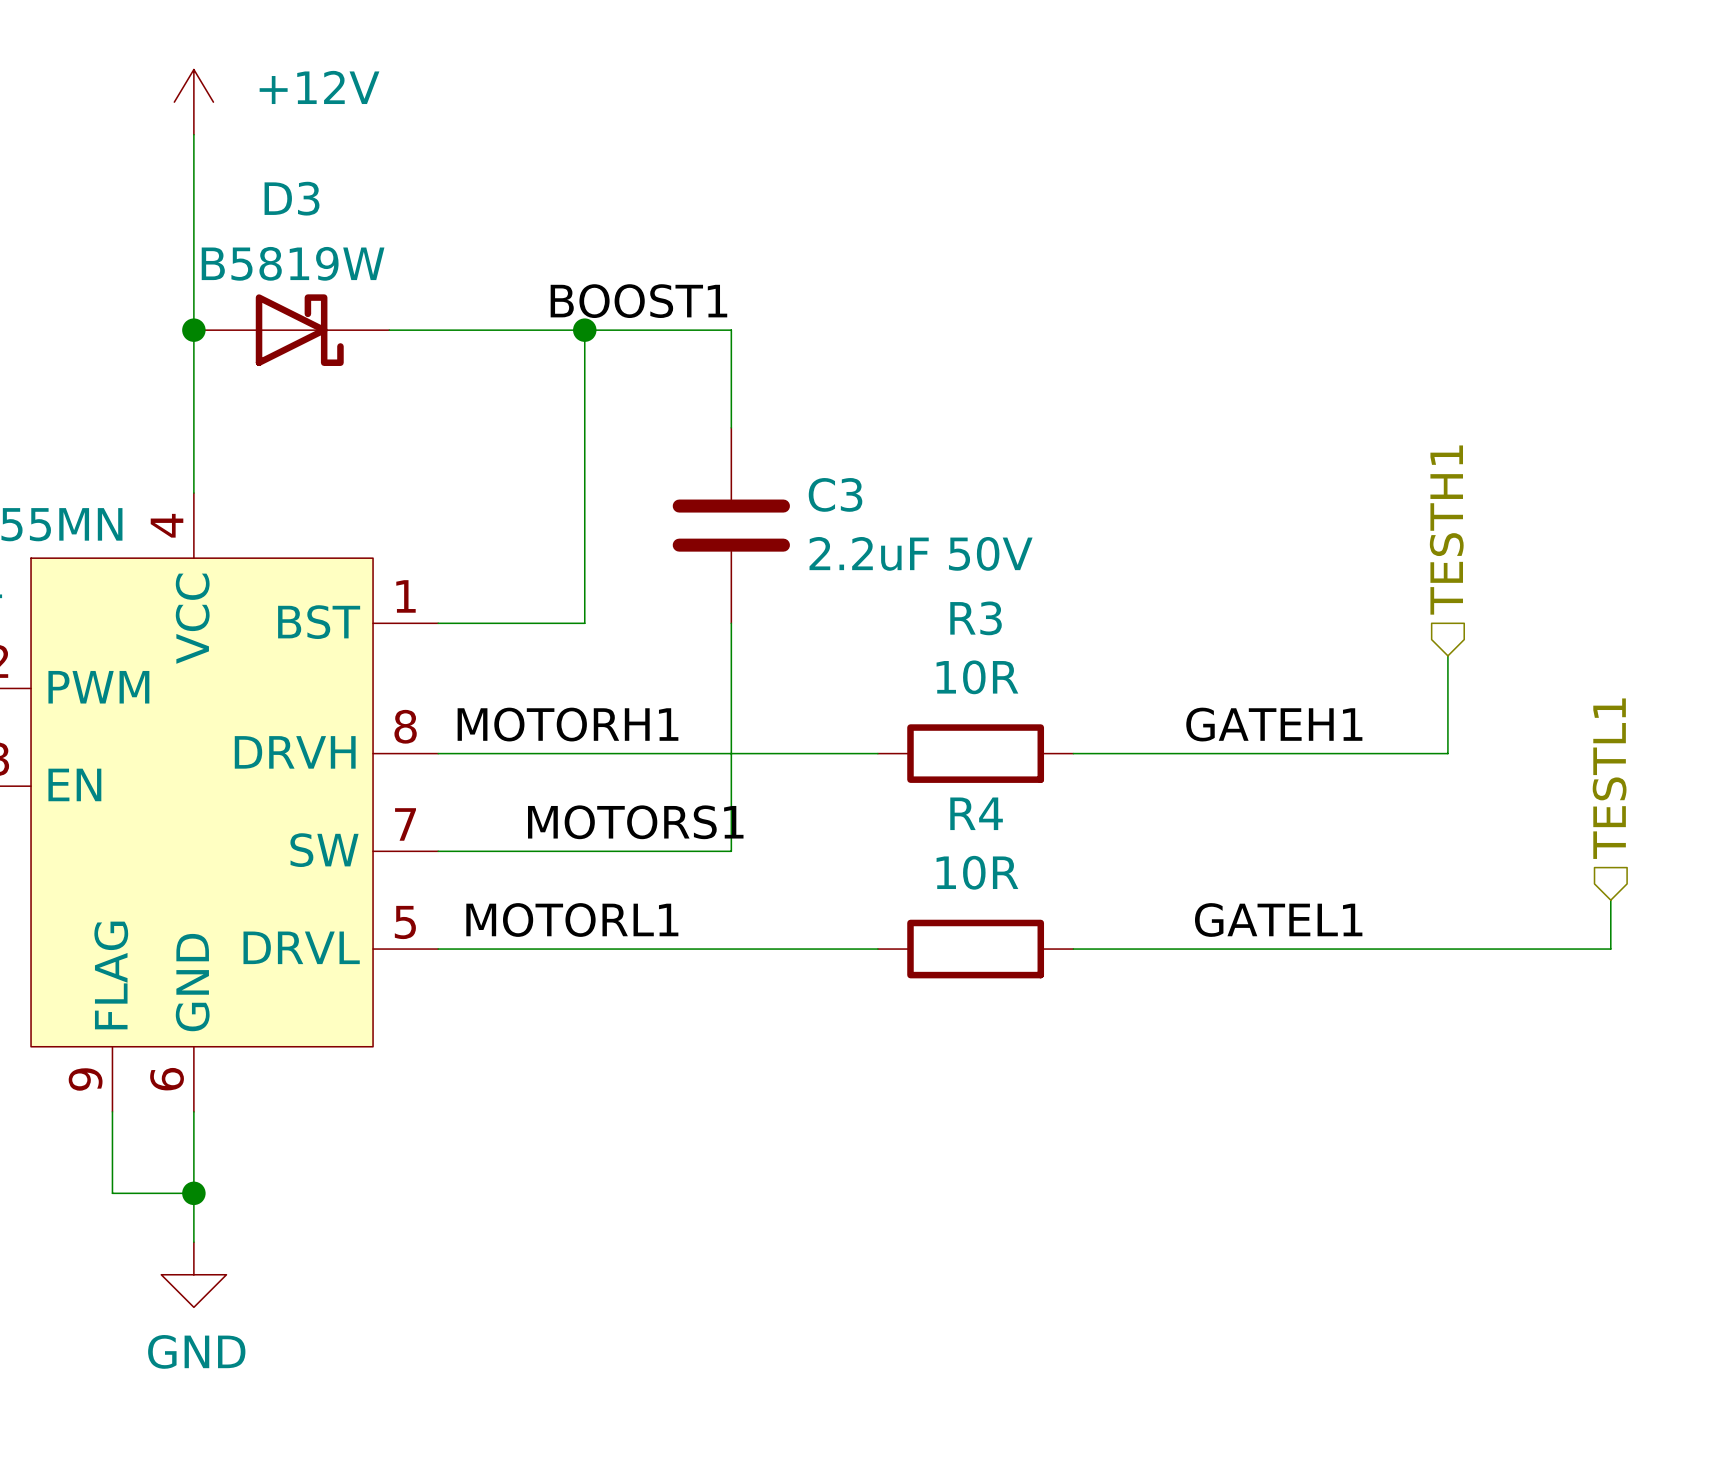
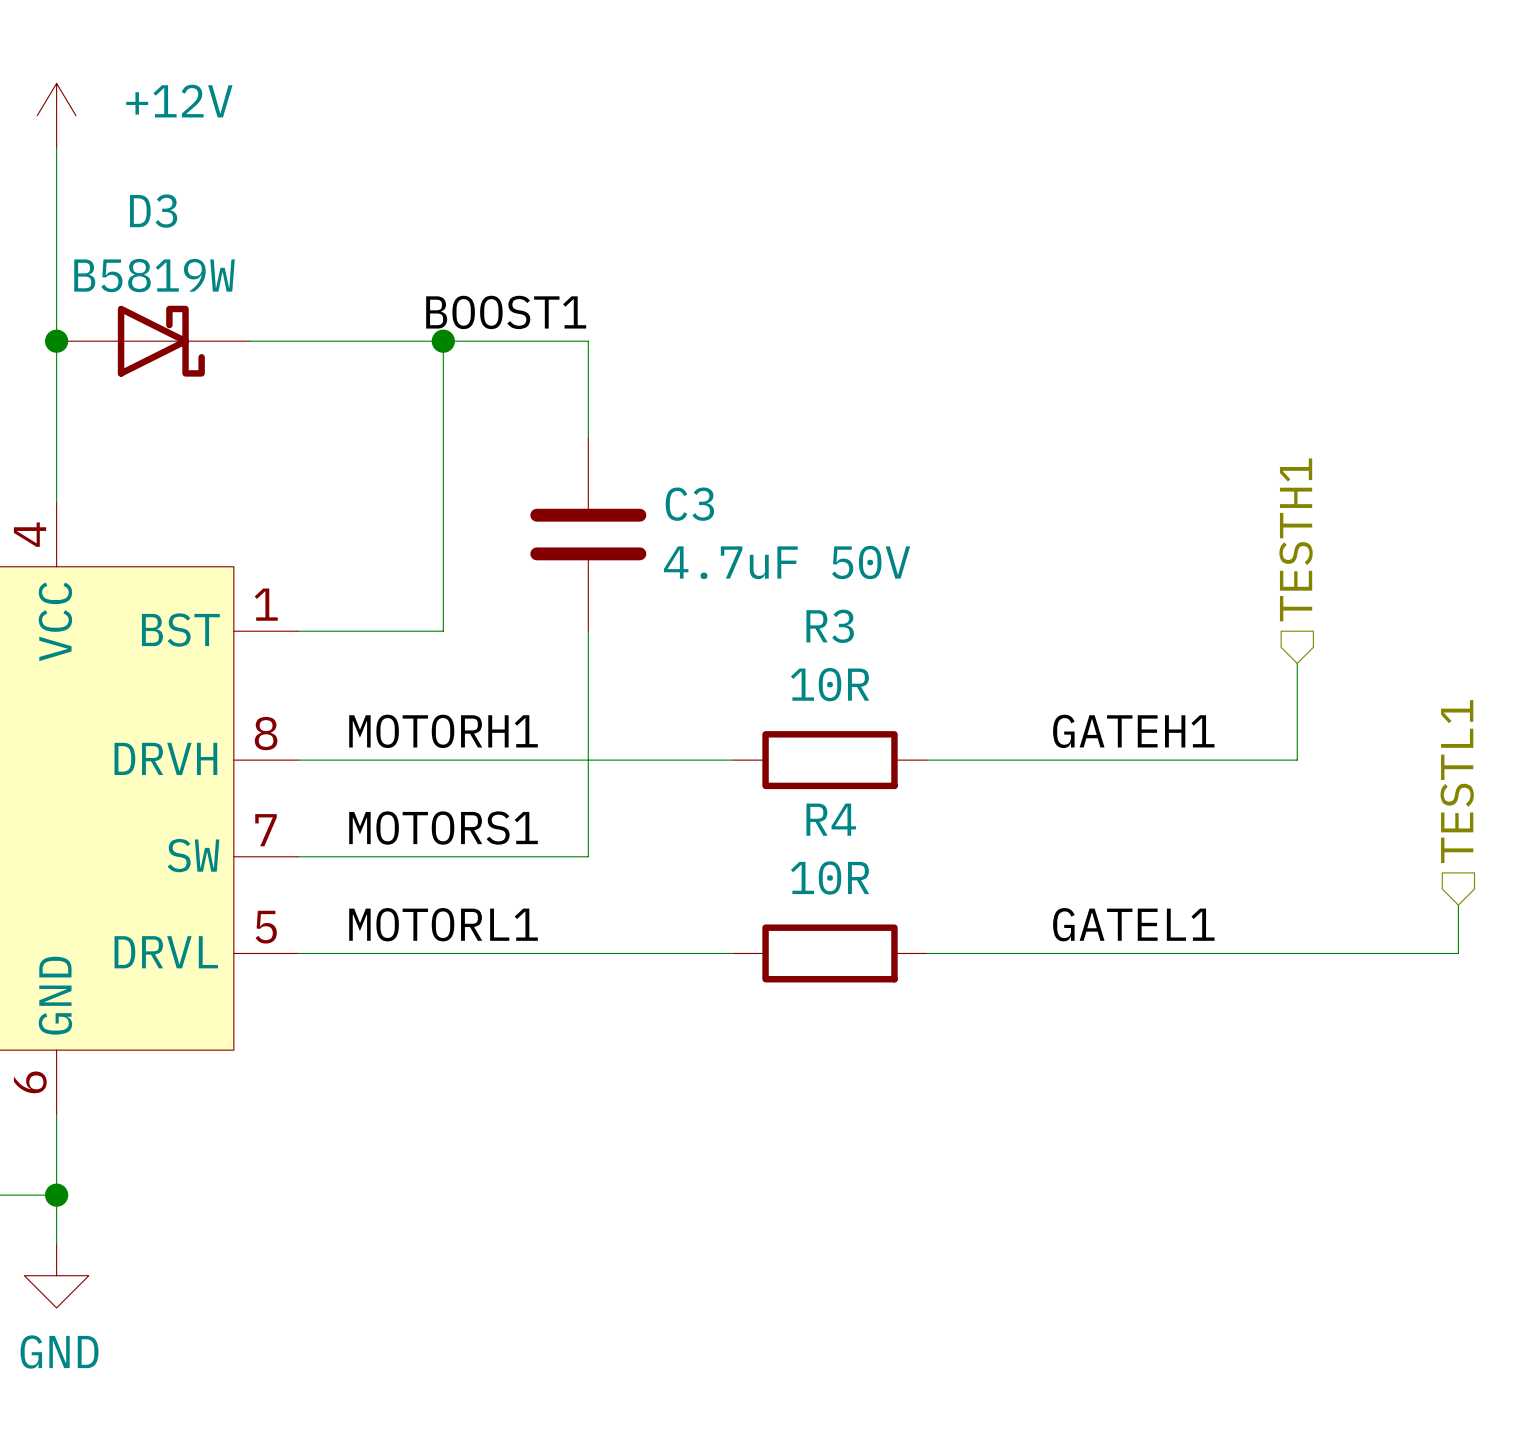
C3 value: 2.2uF 50V (921, 553) -> 4.7uF 50V (787, 562)
label position: MOTORS1 (635, 822) -> MOTORS1 (443, 828)

